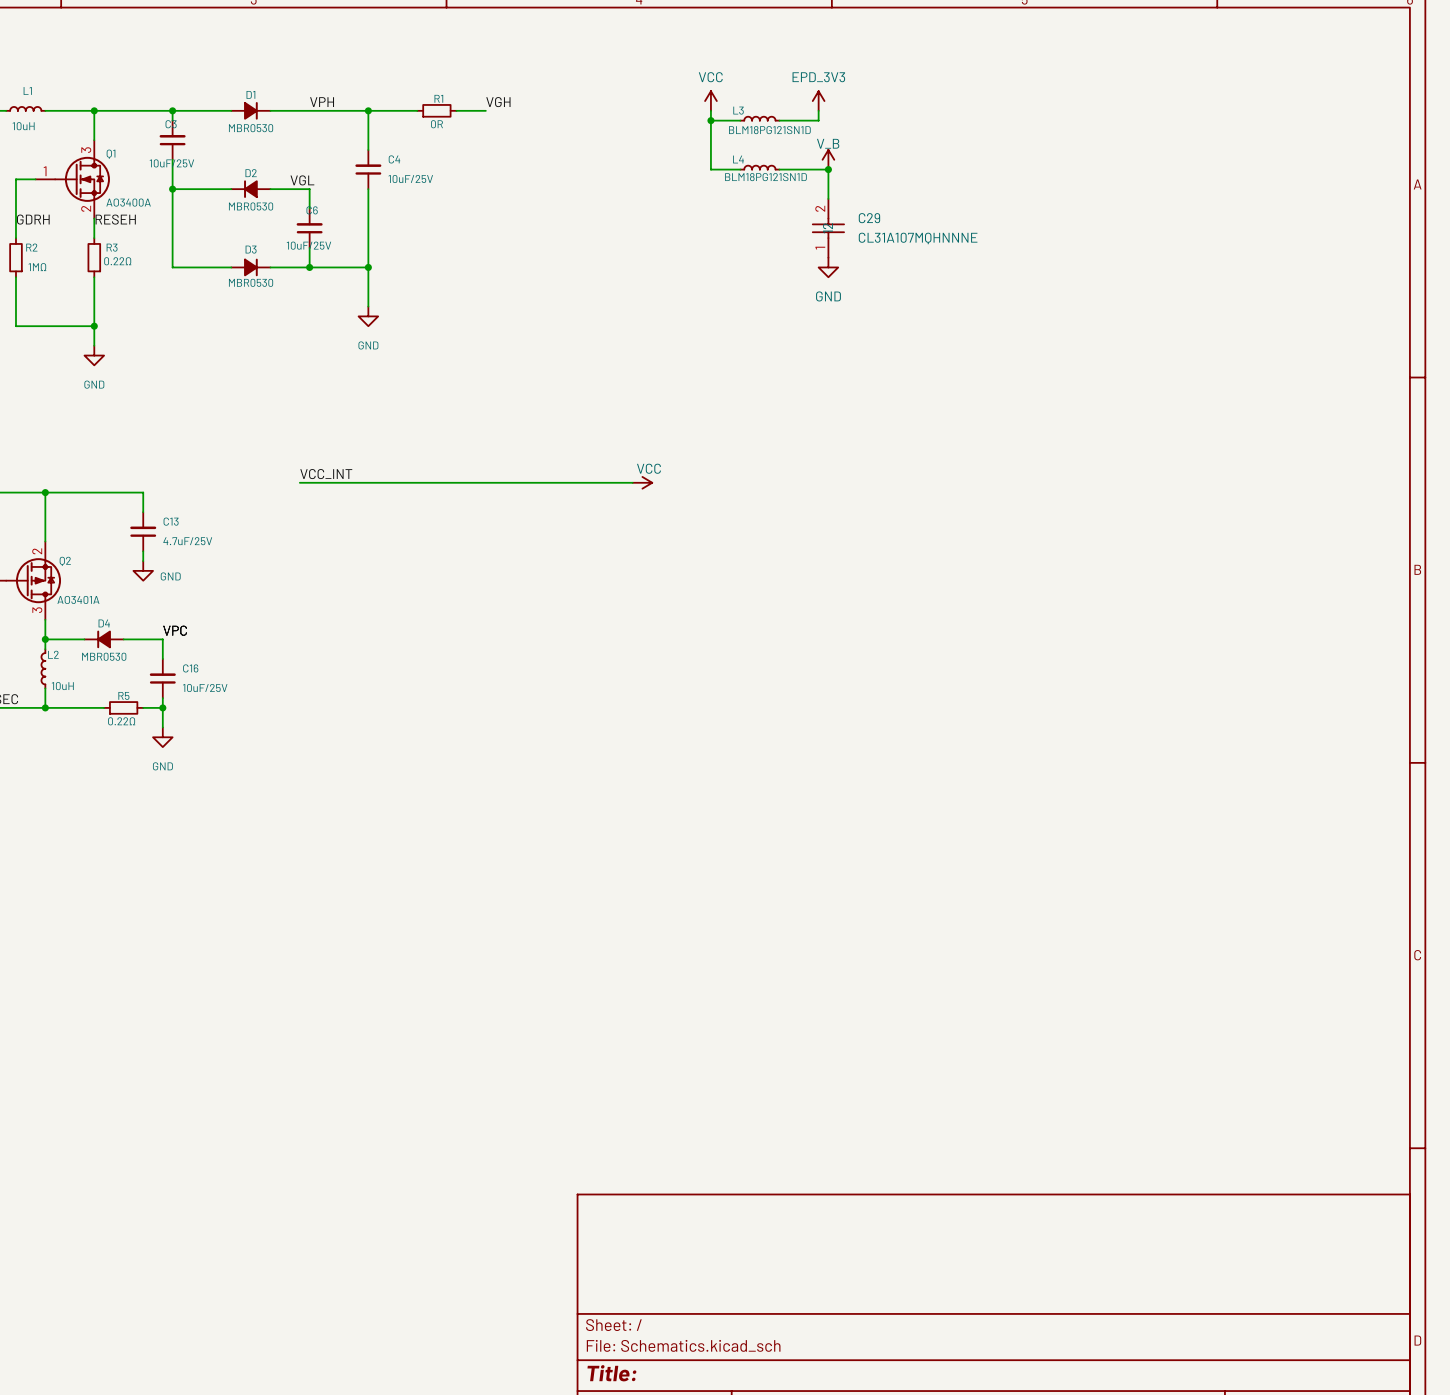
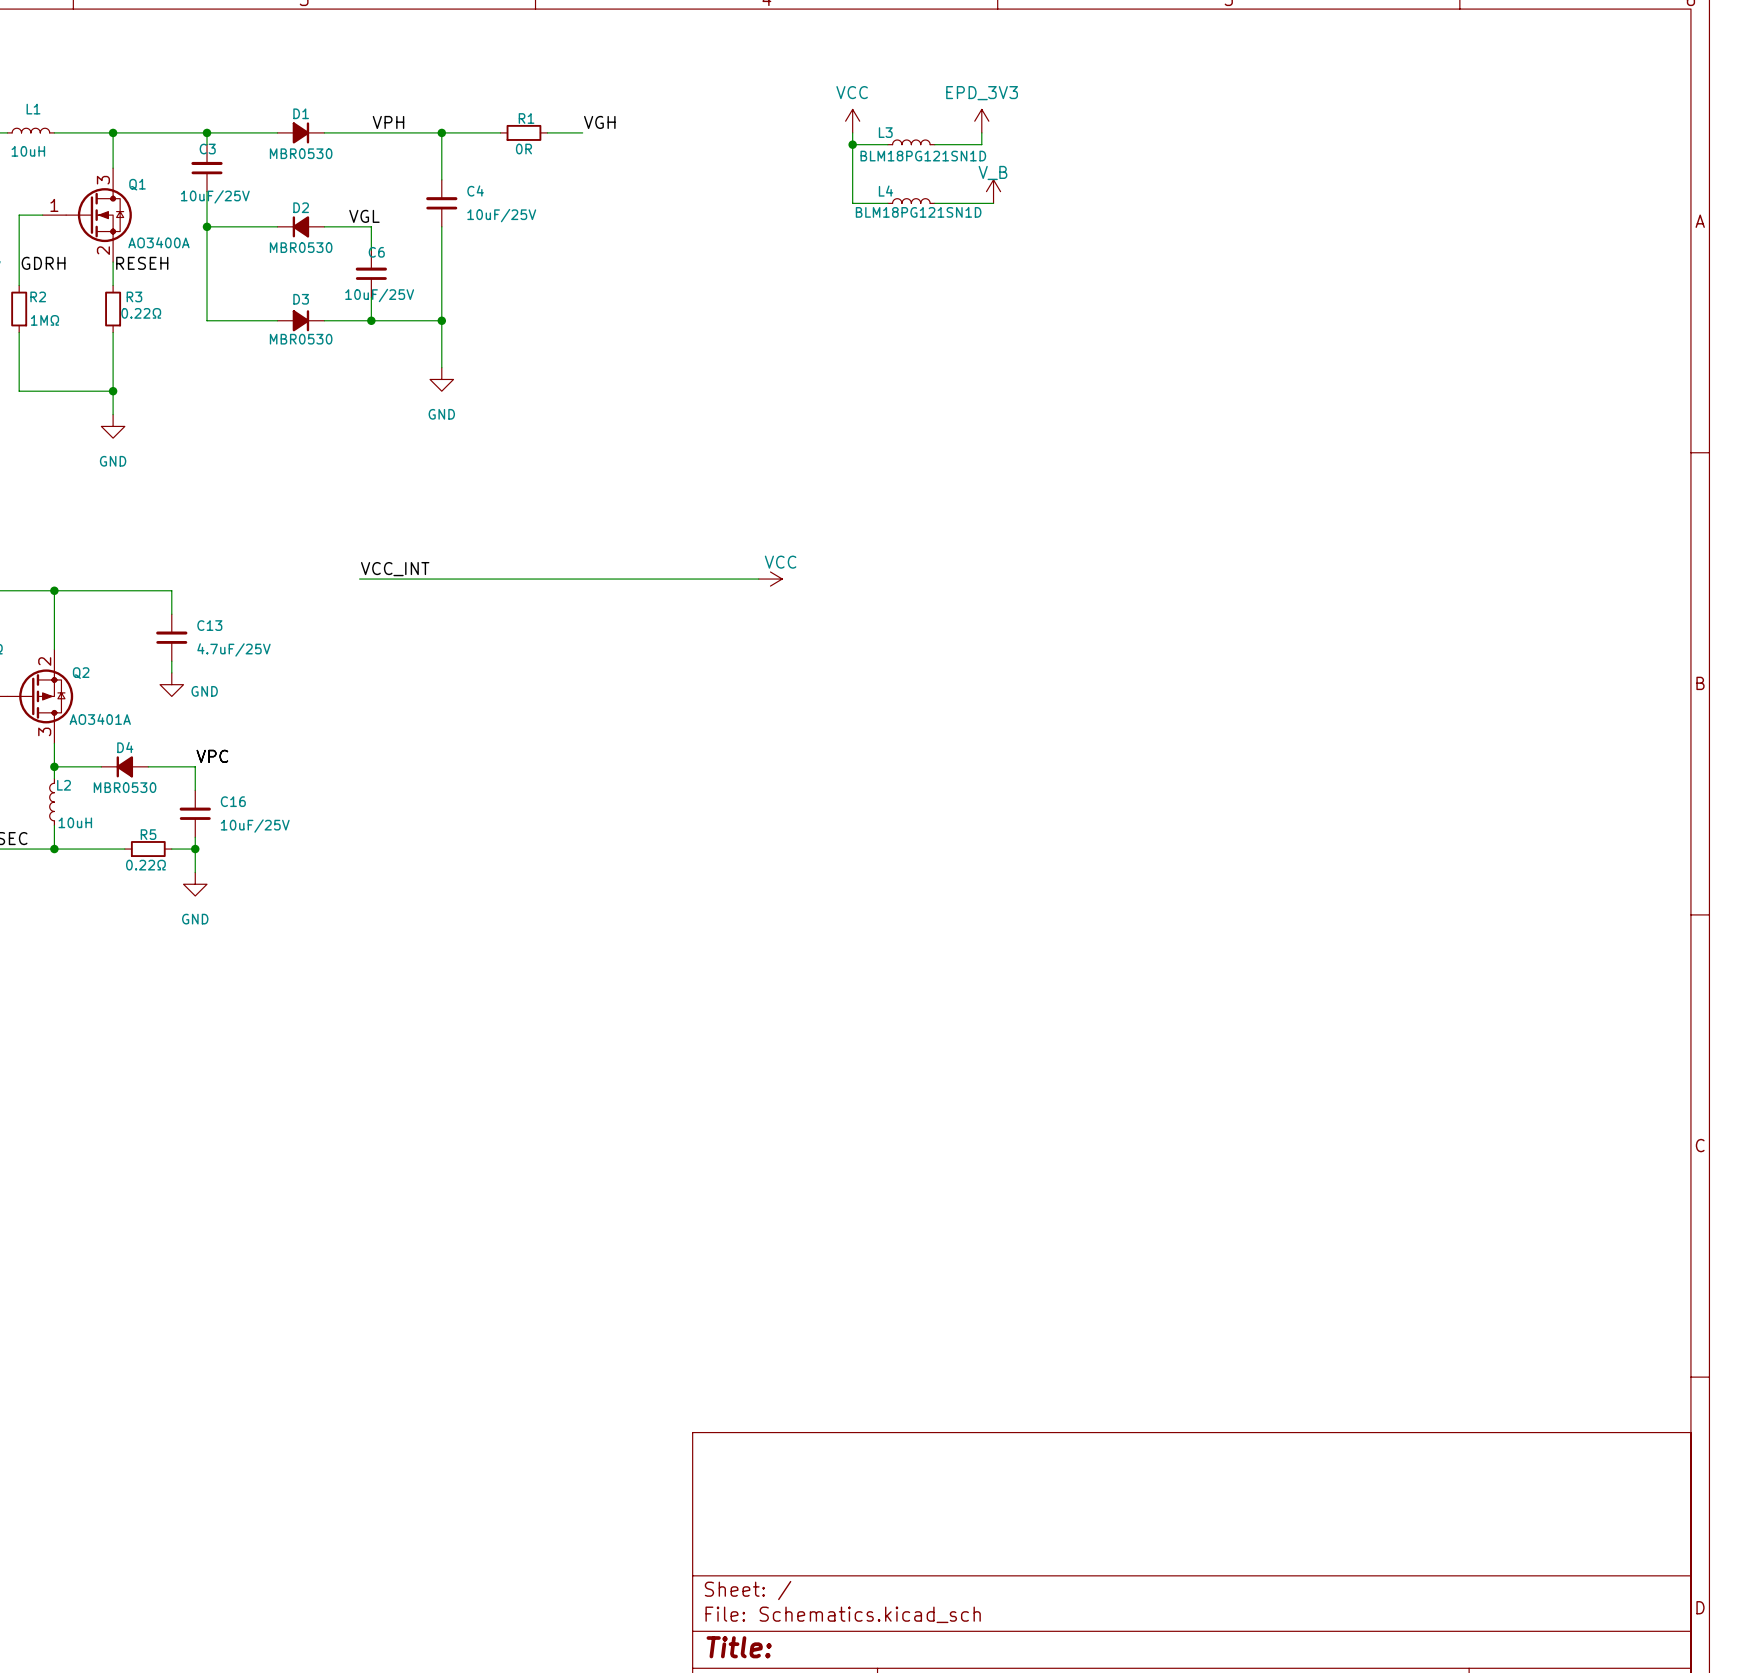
wire: (828, 169) (828, 198) -> none
junction: (828, 169) -> none
C29: CL31A107MQHNNNE (828, 228) -> none
power symbol: GND (828, 267) -> none

